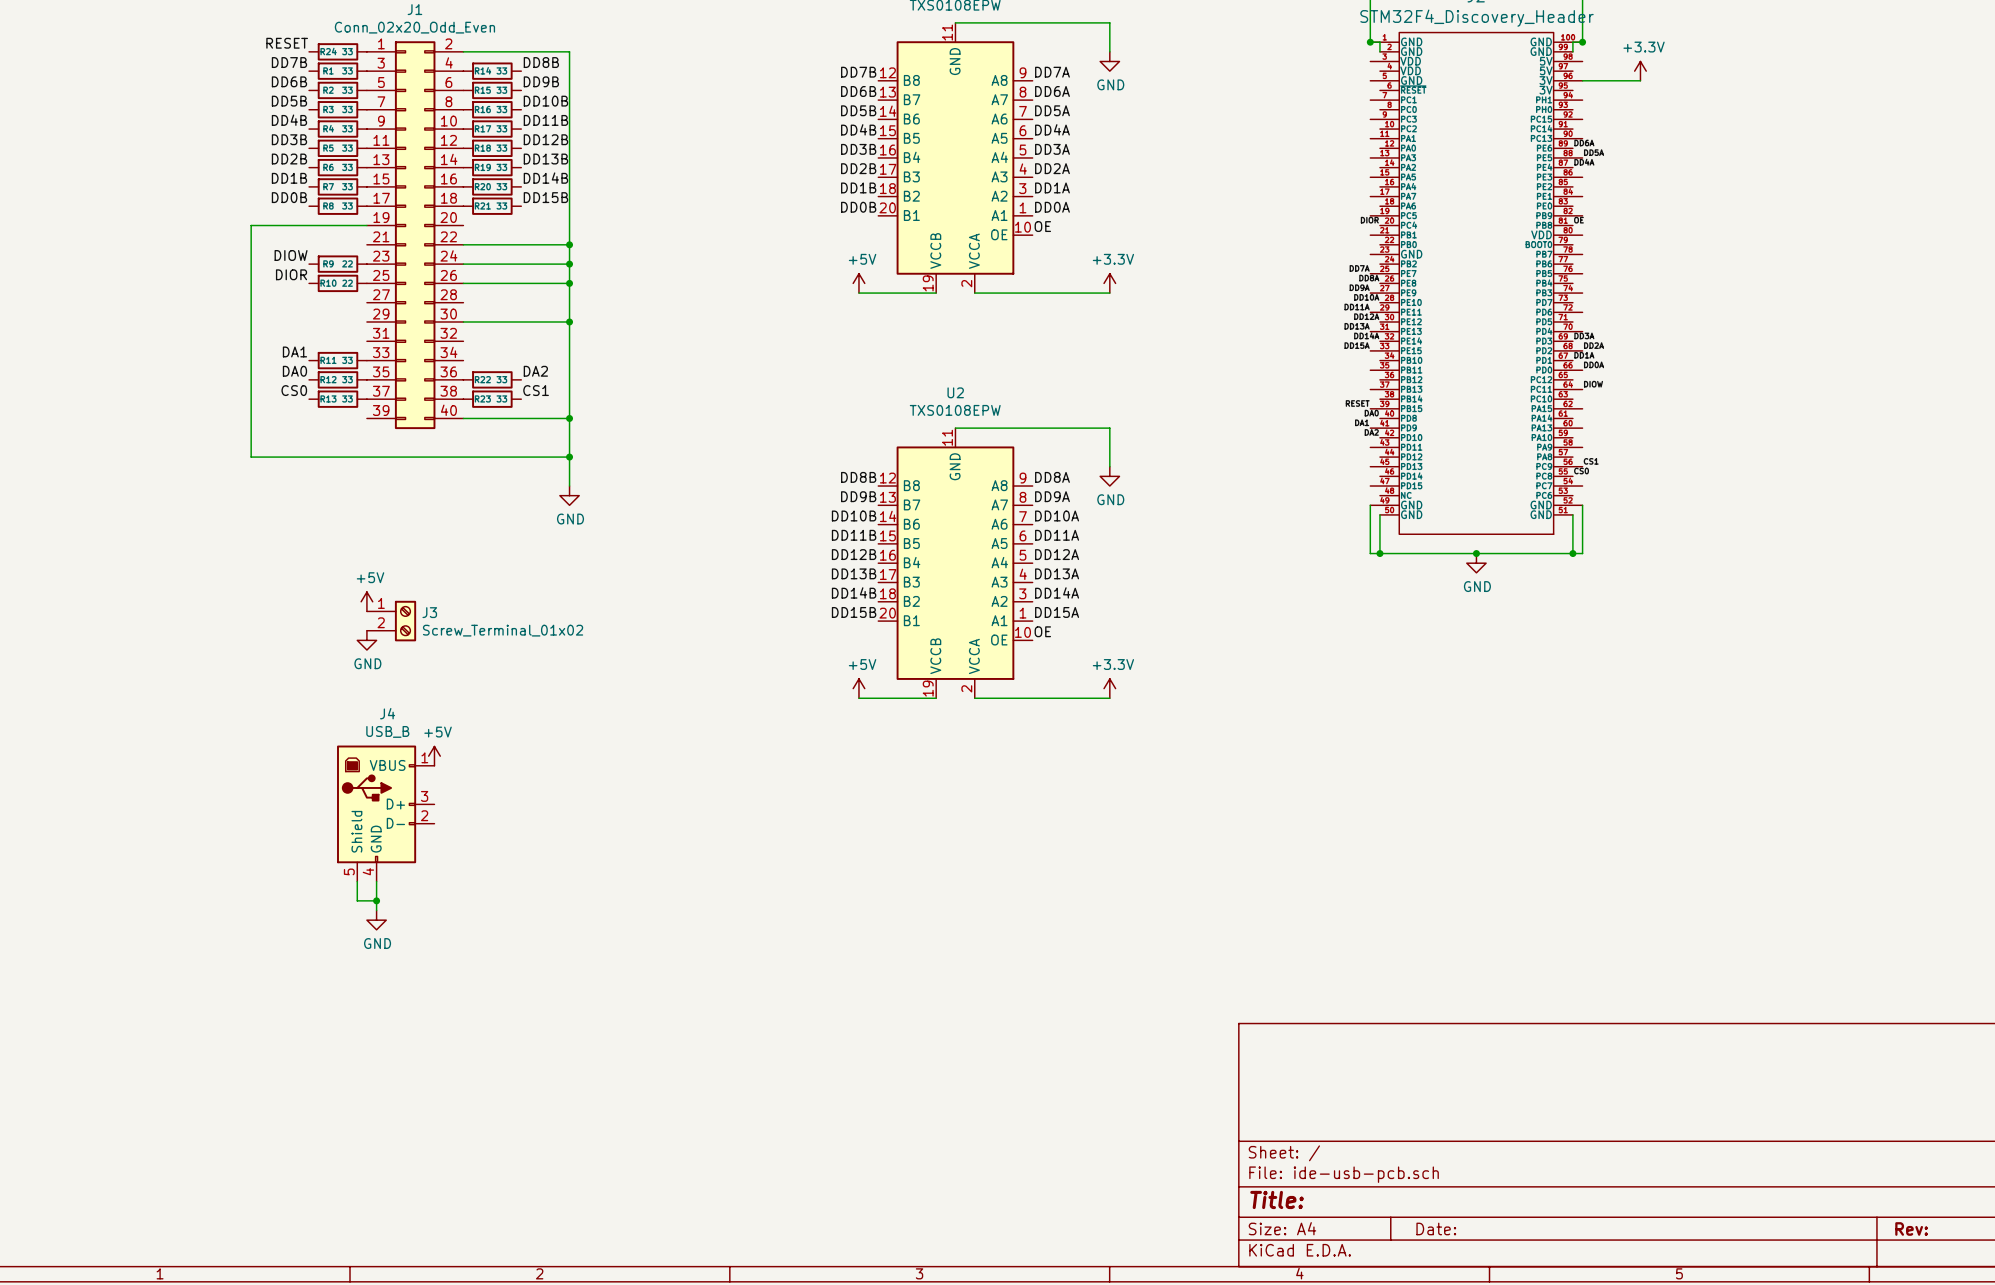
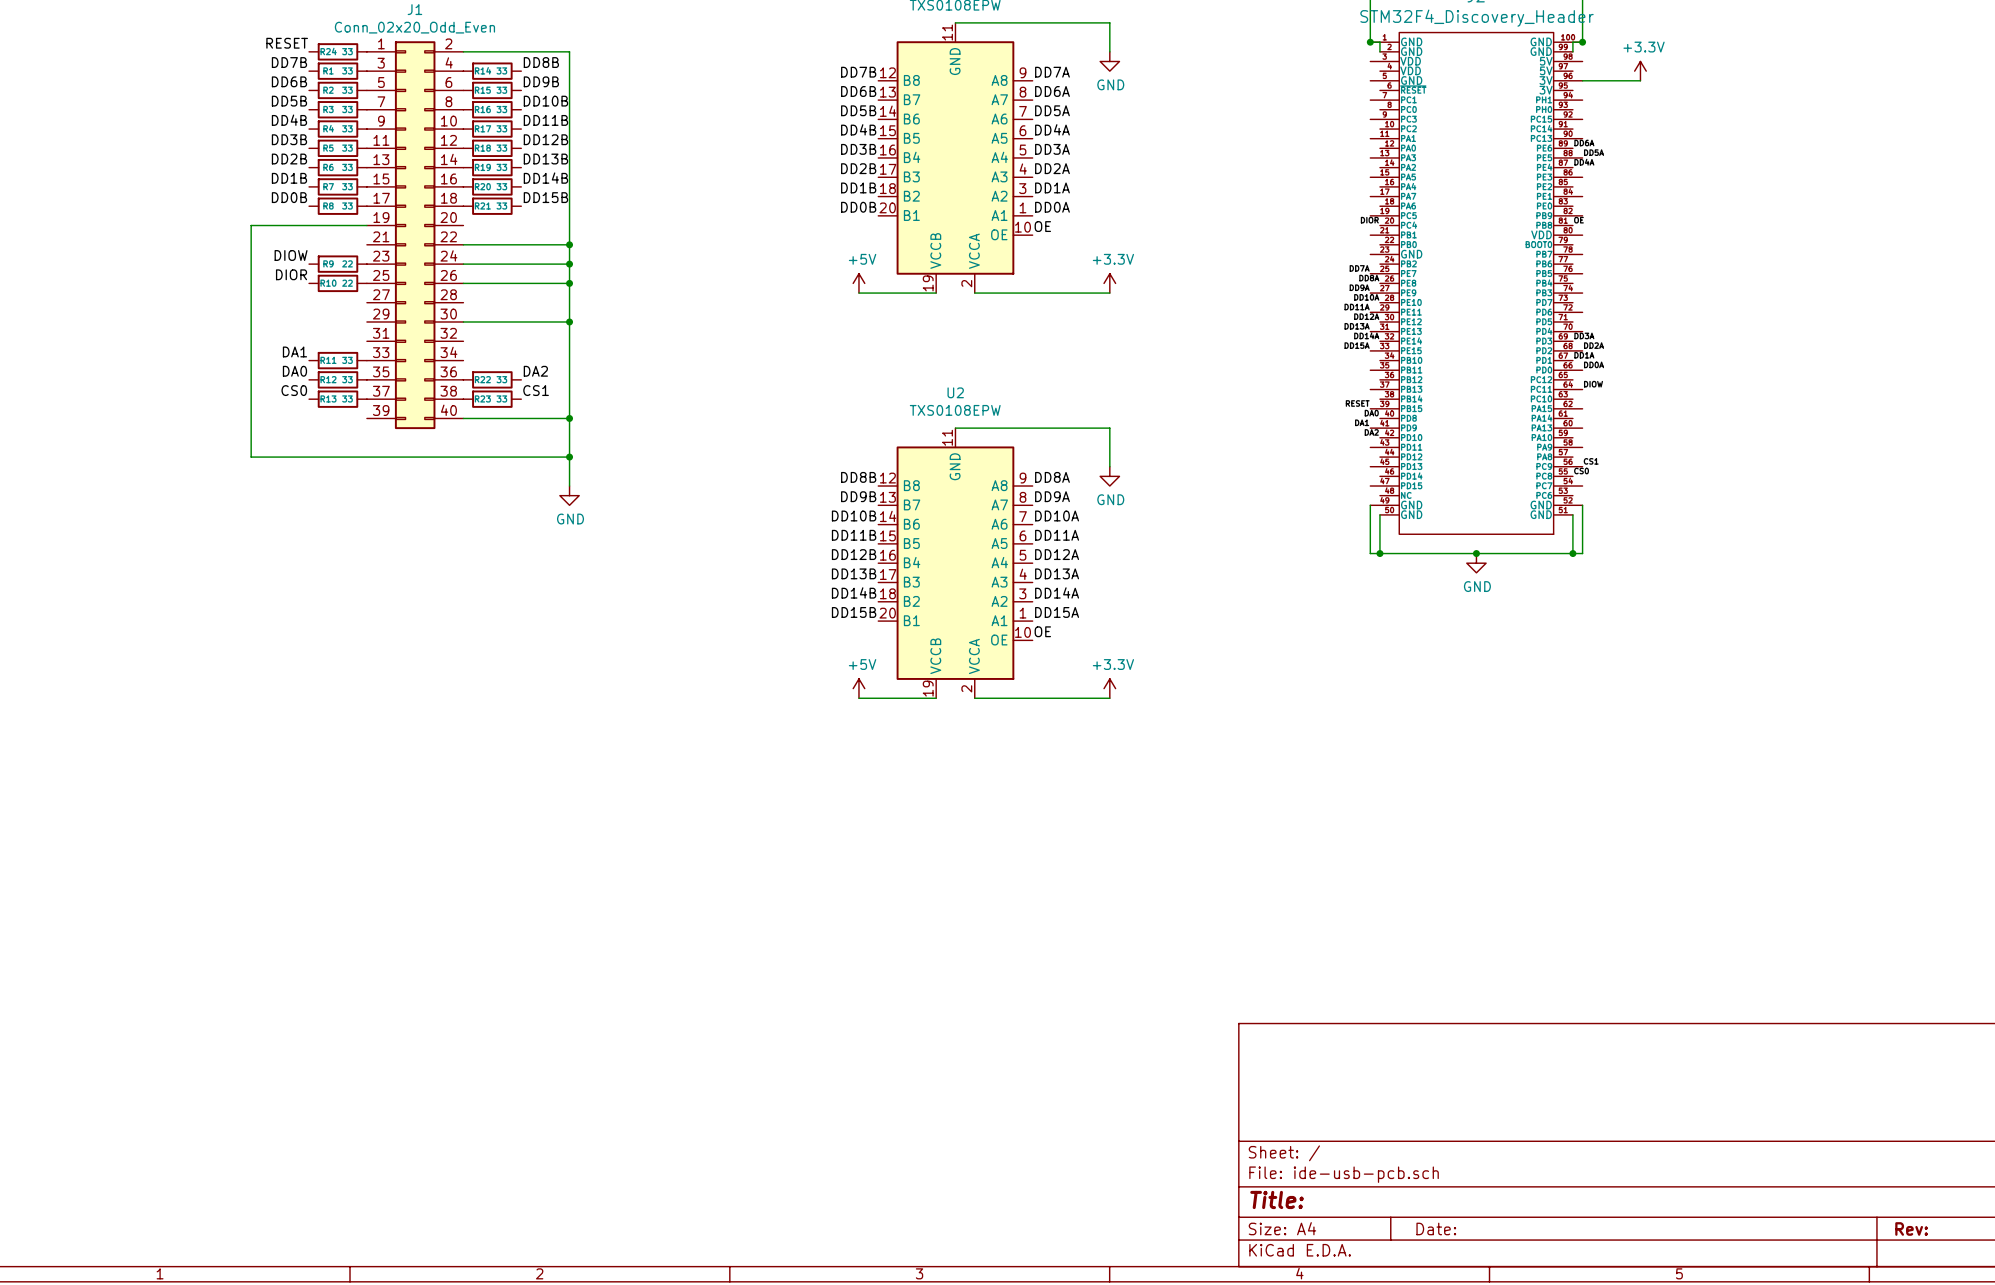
power symbol: +5V (366, 601) -> none
J3: Screw_Terminal_01x02 (391, 621) -> none
power symbol: GND (366, 640) -> none
power symbol: +5V (434, 756) -> none
J4: USB_B (385, 813) -> none
wire: (357, 881) (357, 900) (376, 900) -> none
wire: (376, 881) (376, 910) -> none
junction: (376, 900) -> none
power symbol: GND (376, 920) -> none

